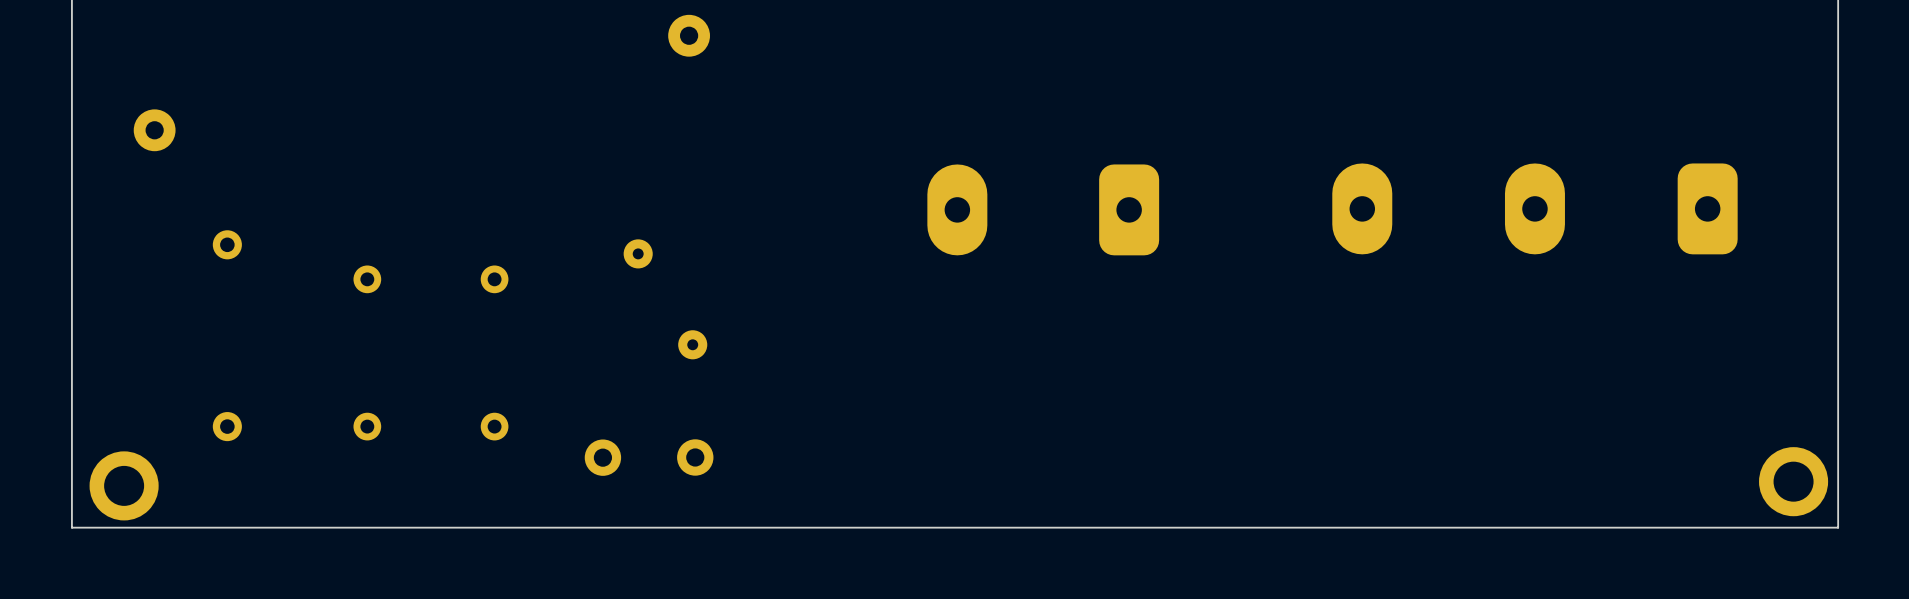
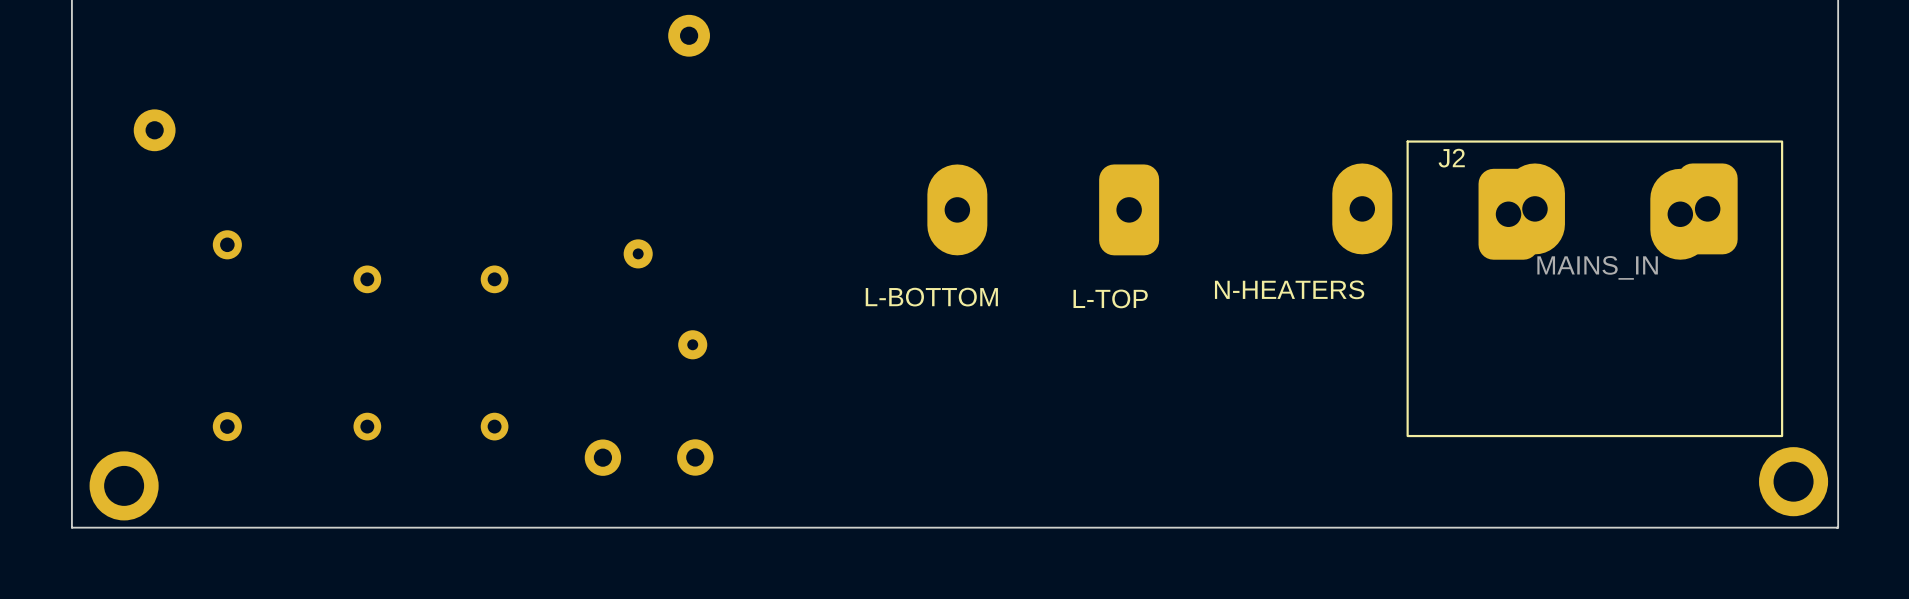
J2: none -> MAINS_IN (1594, 288)
text: none -> N-HEATERS (1289, 289)
text: none -> L-BOTTOM (931, 297)
text: none -> L-TOP (1110, 298)

